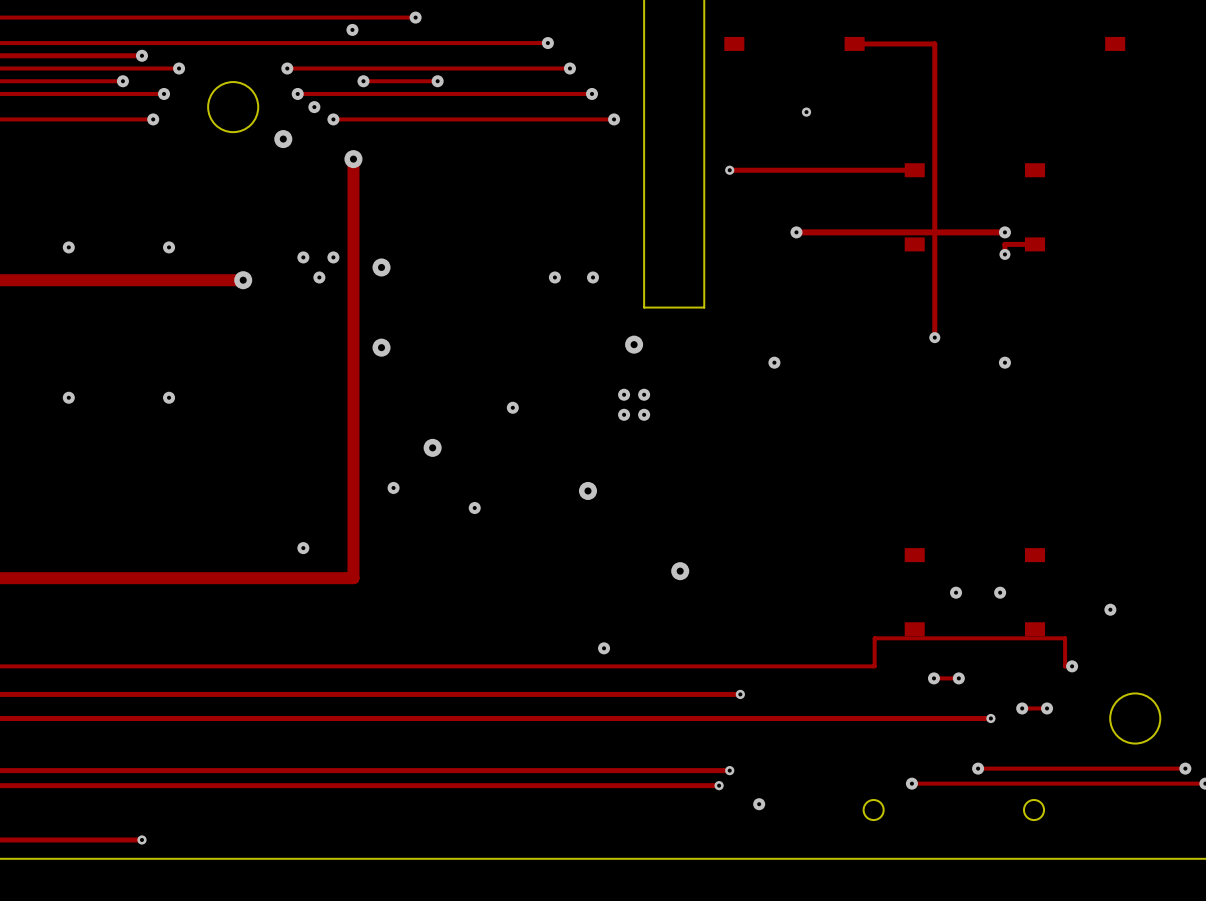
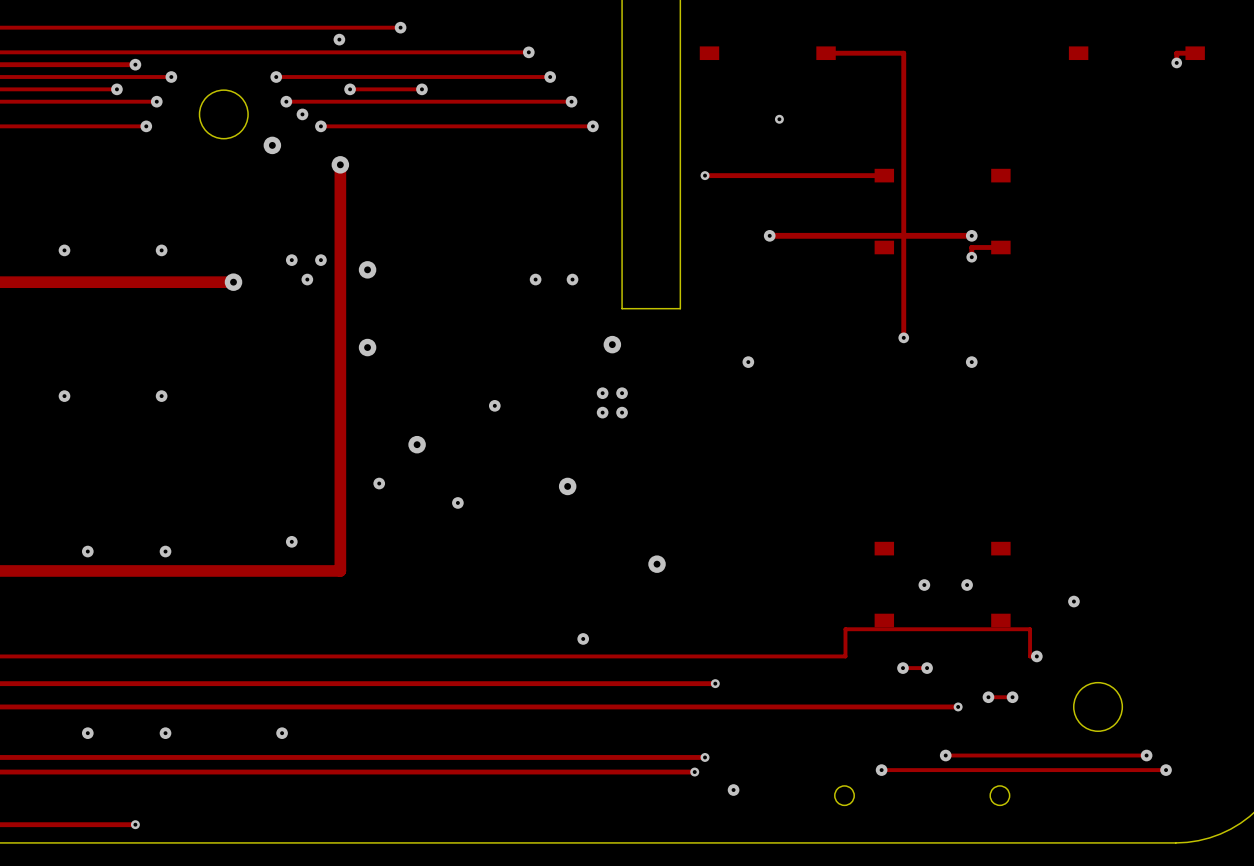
via: none -> (87, 551)
via: none -> (165, 551)
via: none -> (87, 733)
via: none -> (165, 733)
via: none -> (282, 733)

